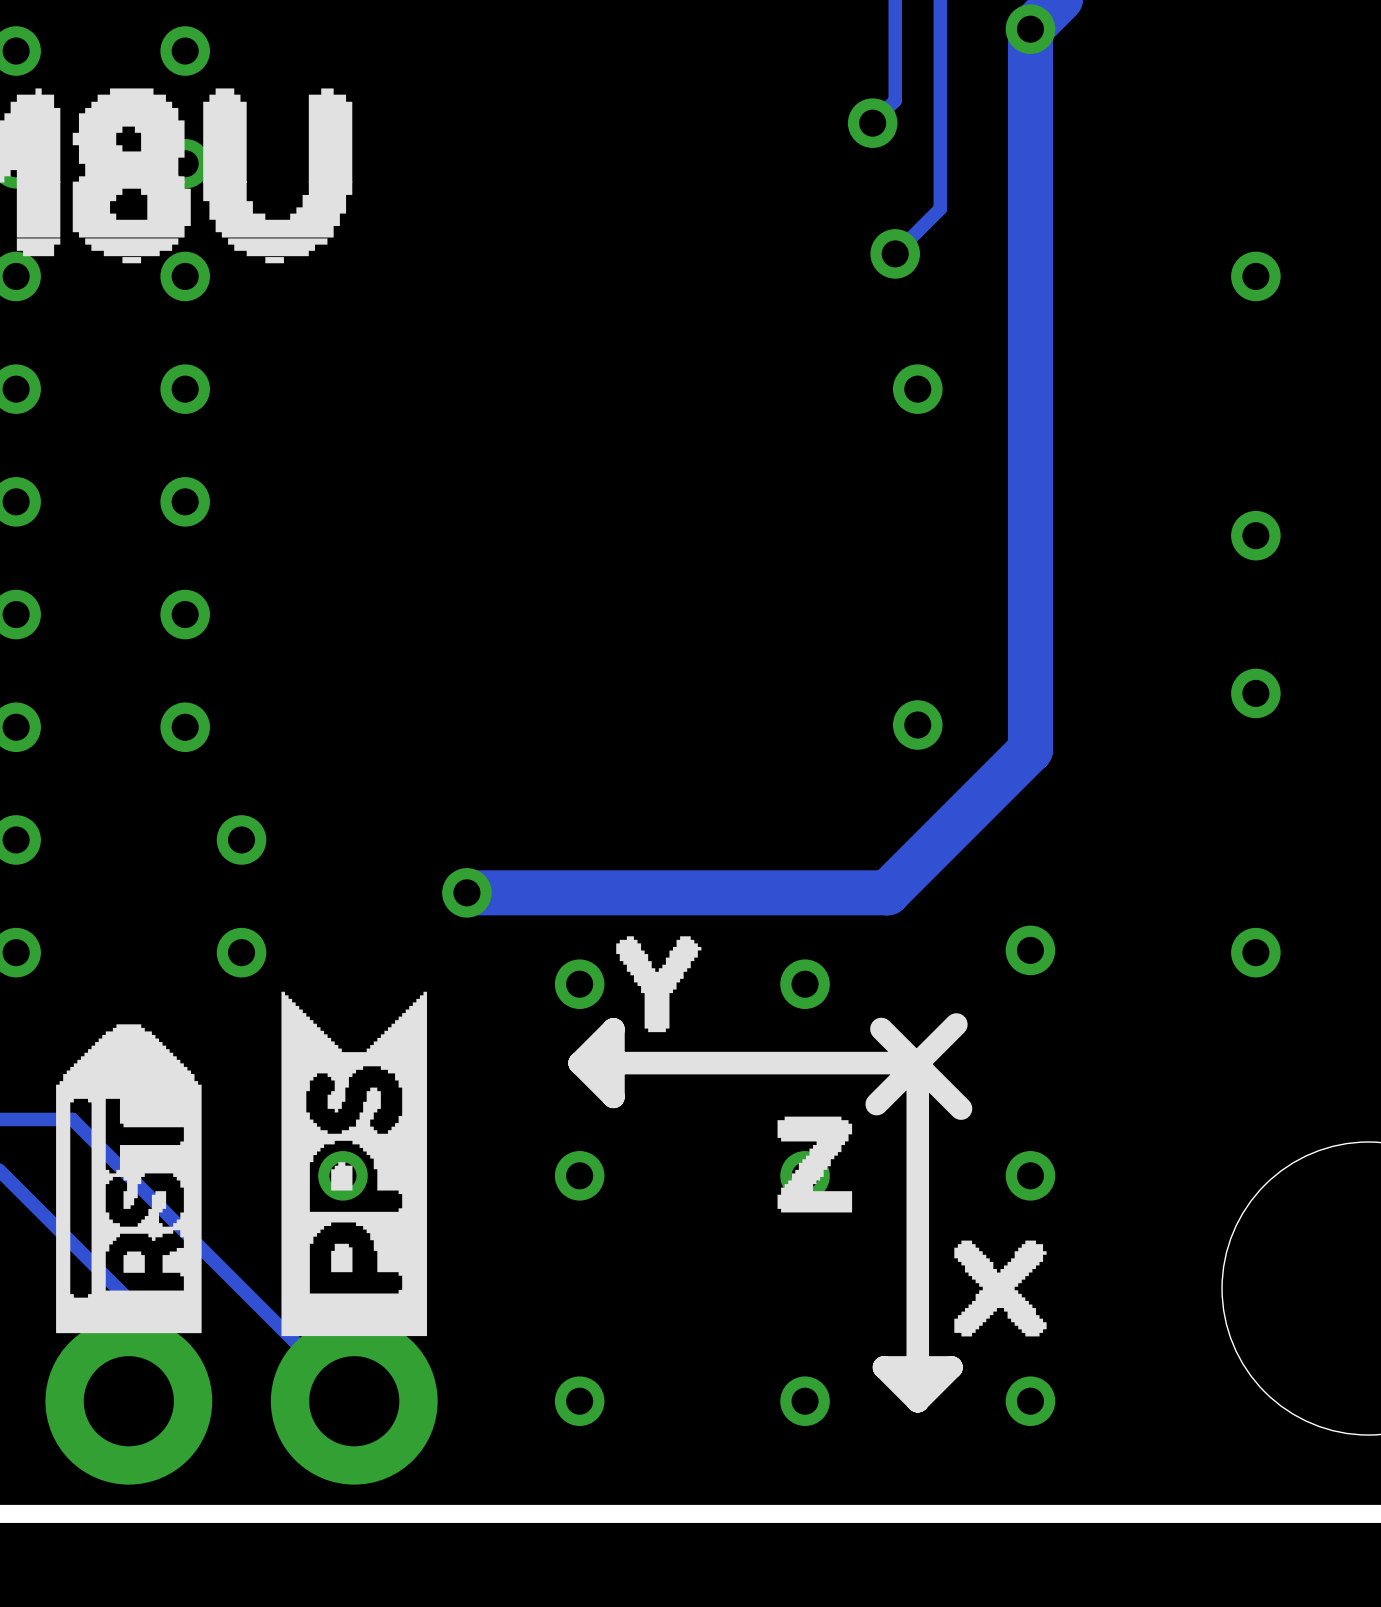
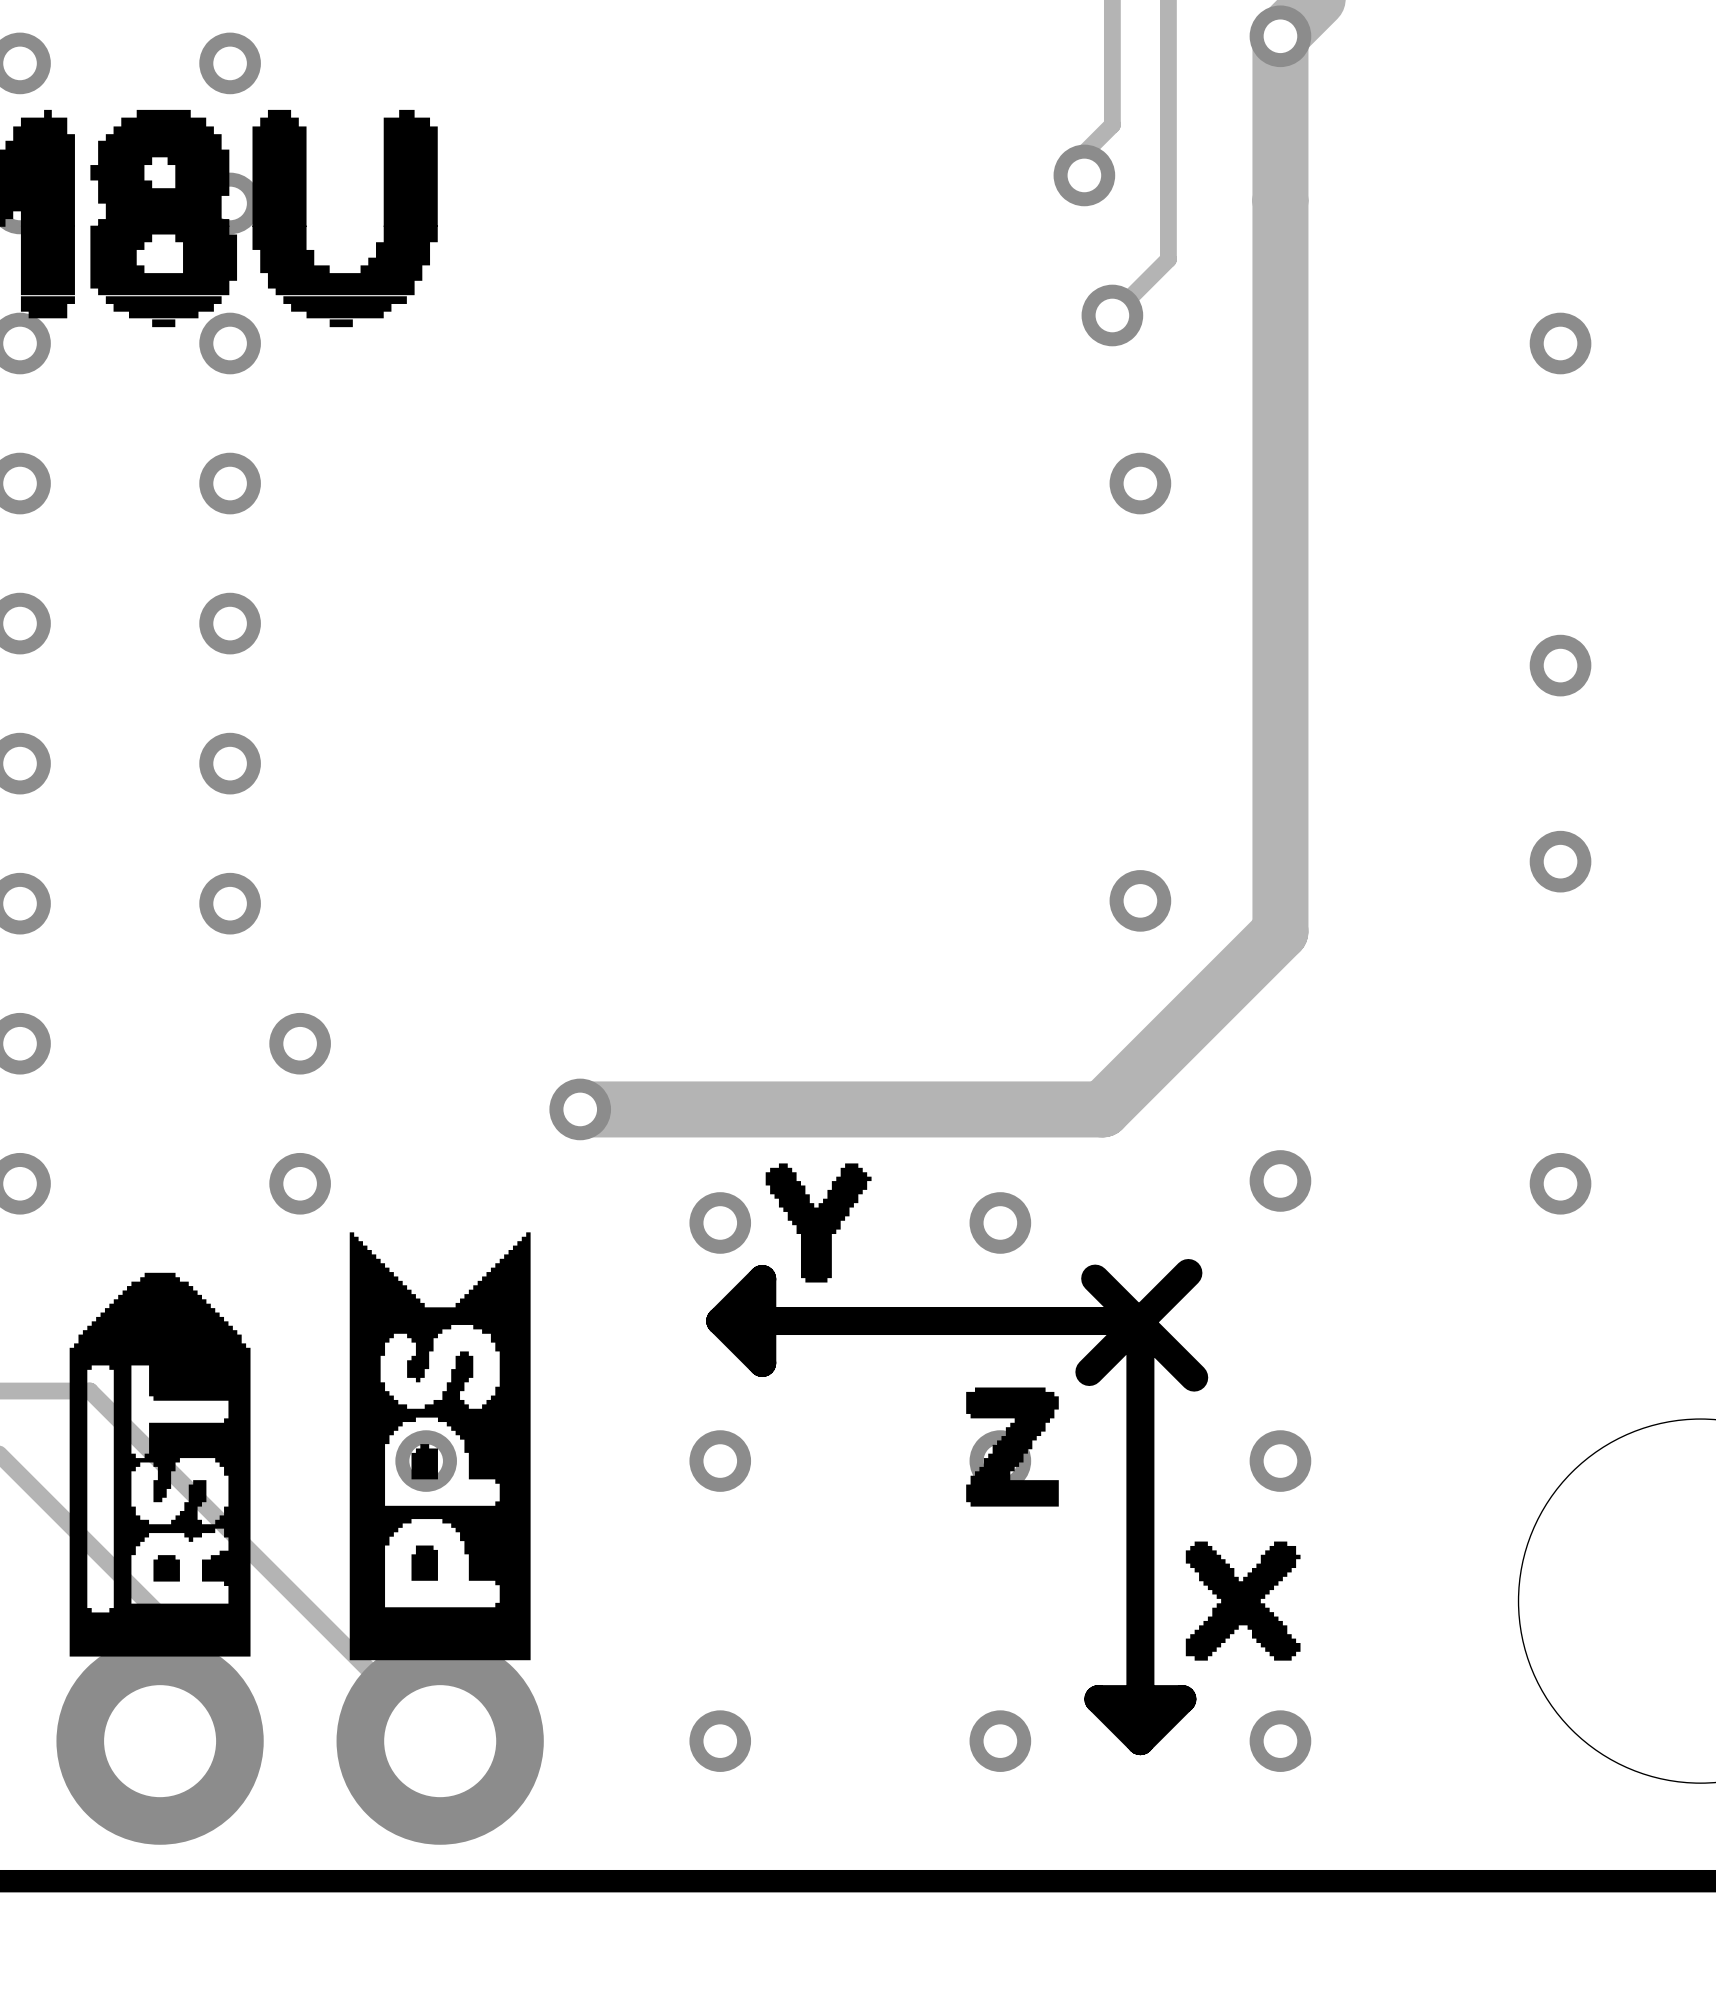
via position: (872, 123) -> (1084, 175)

